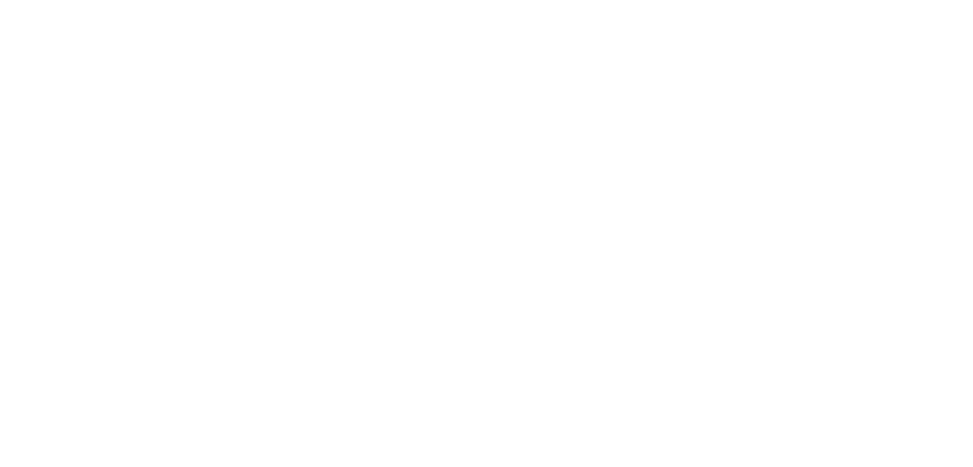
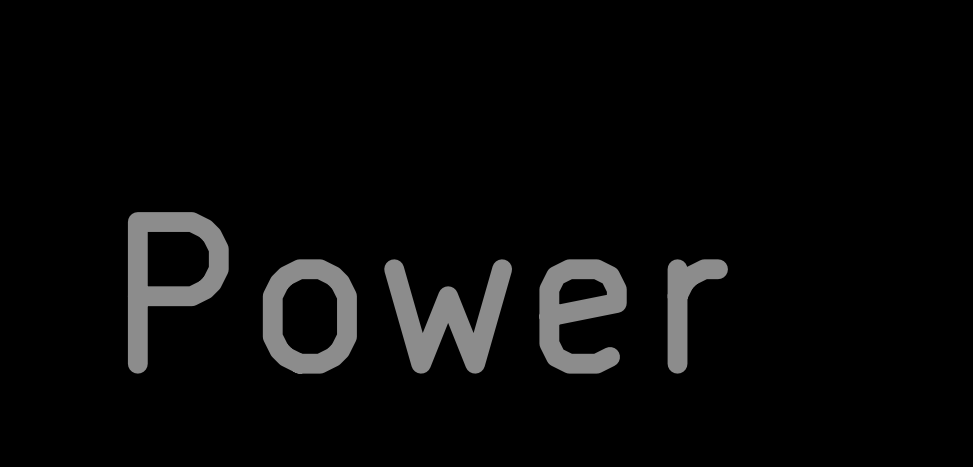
text: none -> Power (427, 292)

